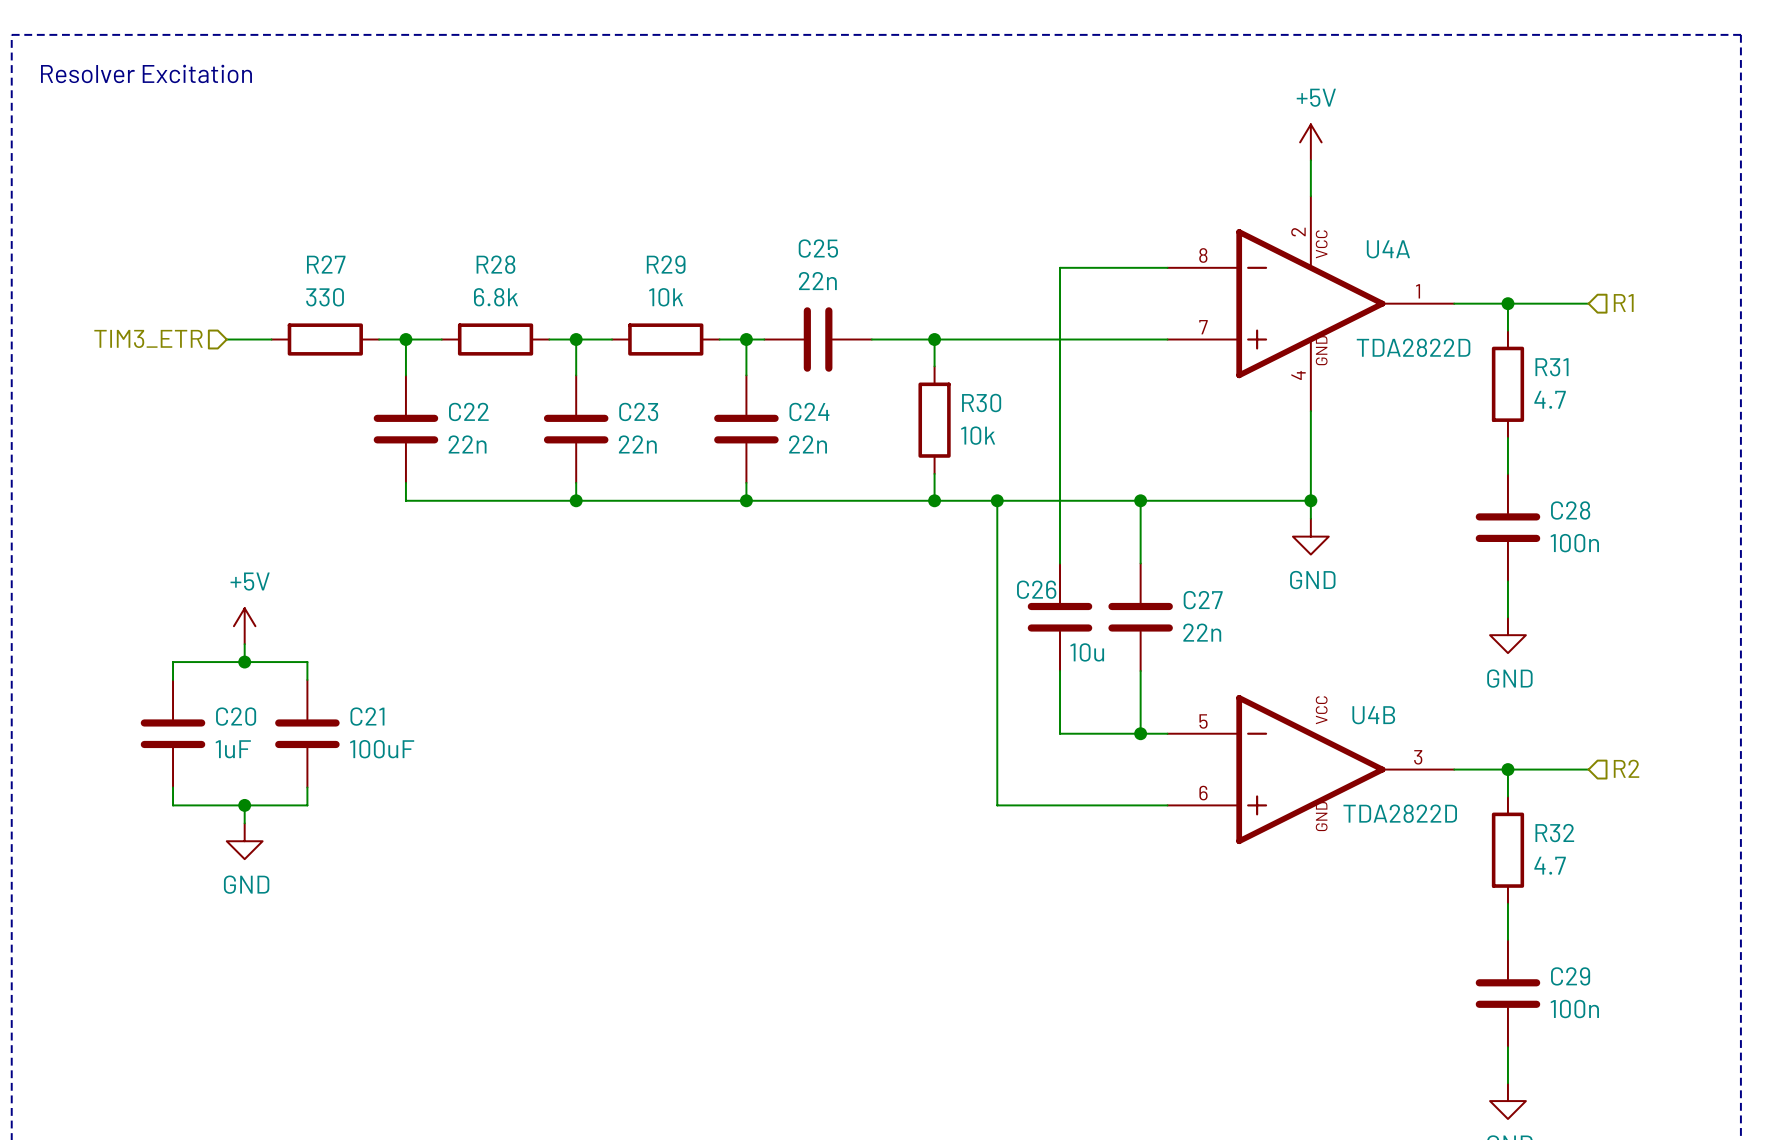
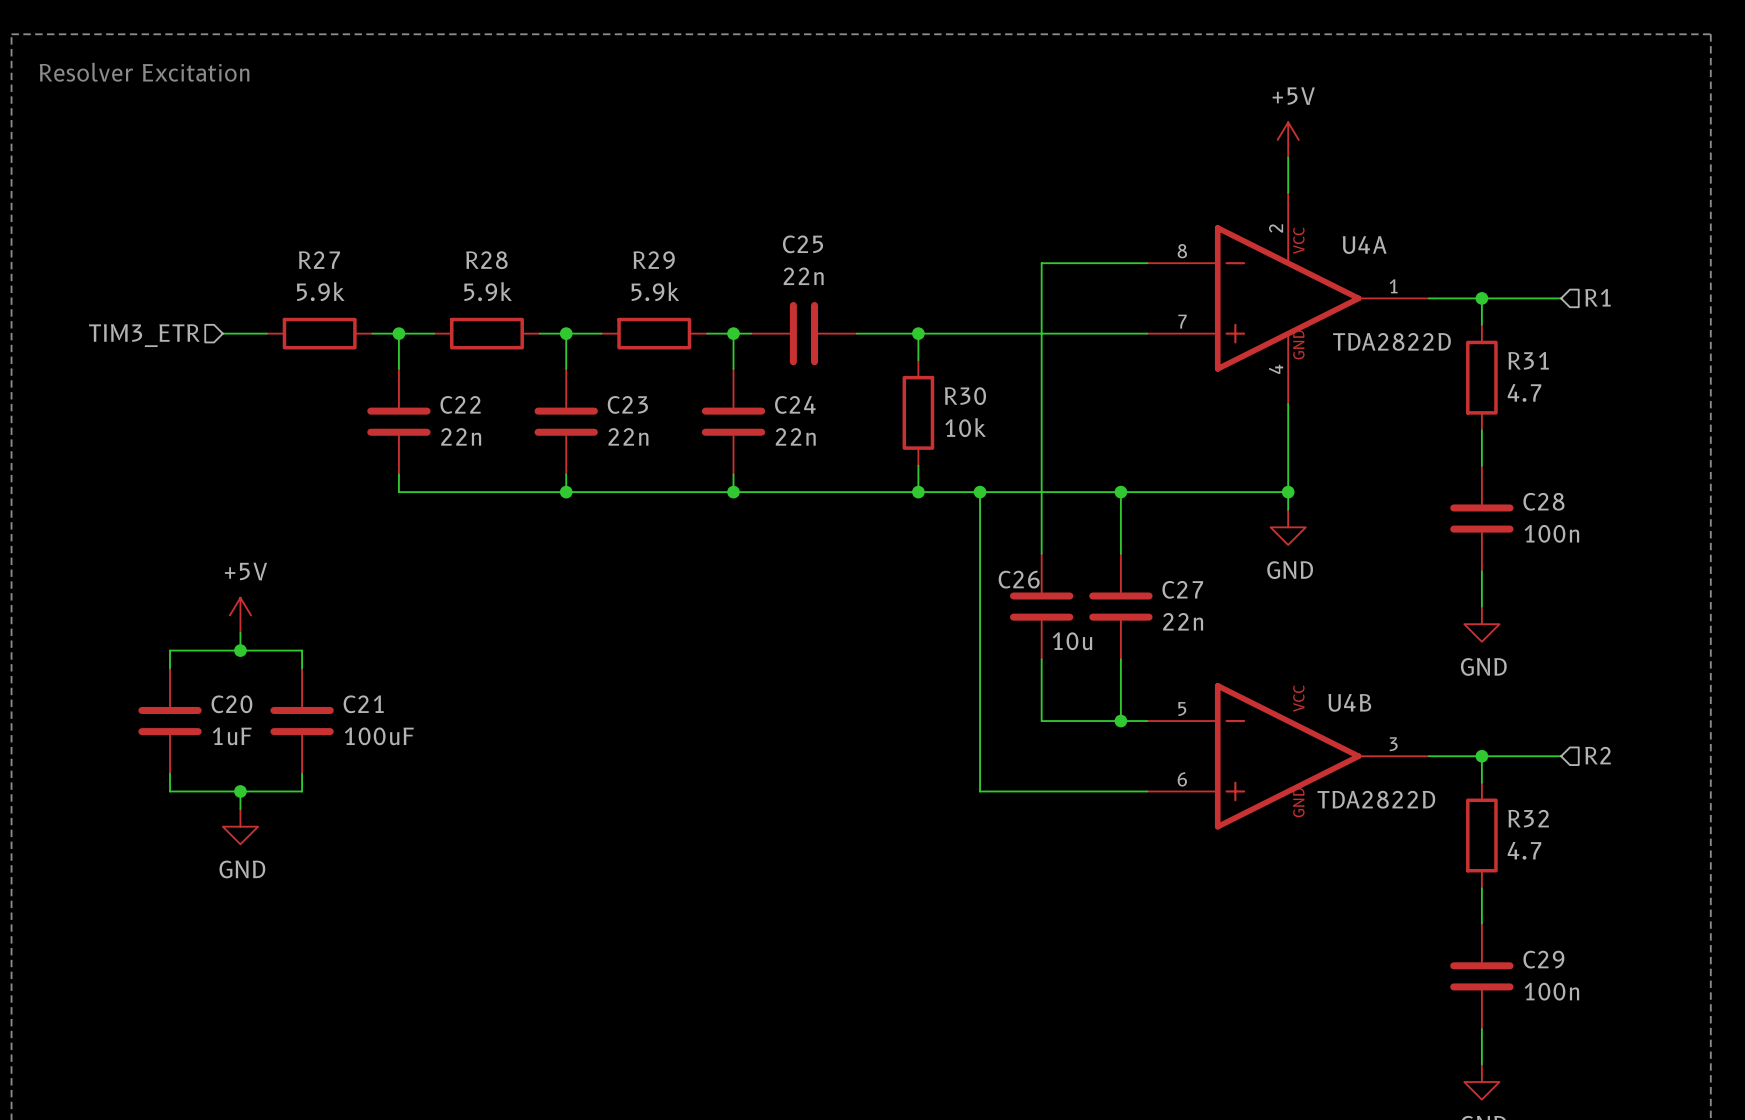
R27 value: 330 (325, 297) -> 5.9k (320, 291)
R28 value: 6.8k (496, 297) -> 5.9k (488, 291)
R29 value: 10k (666, 297) -> 5.9k (655, 291)

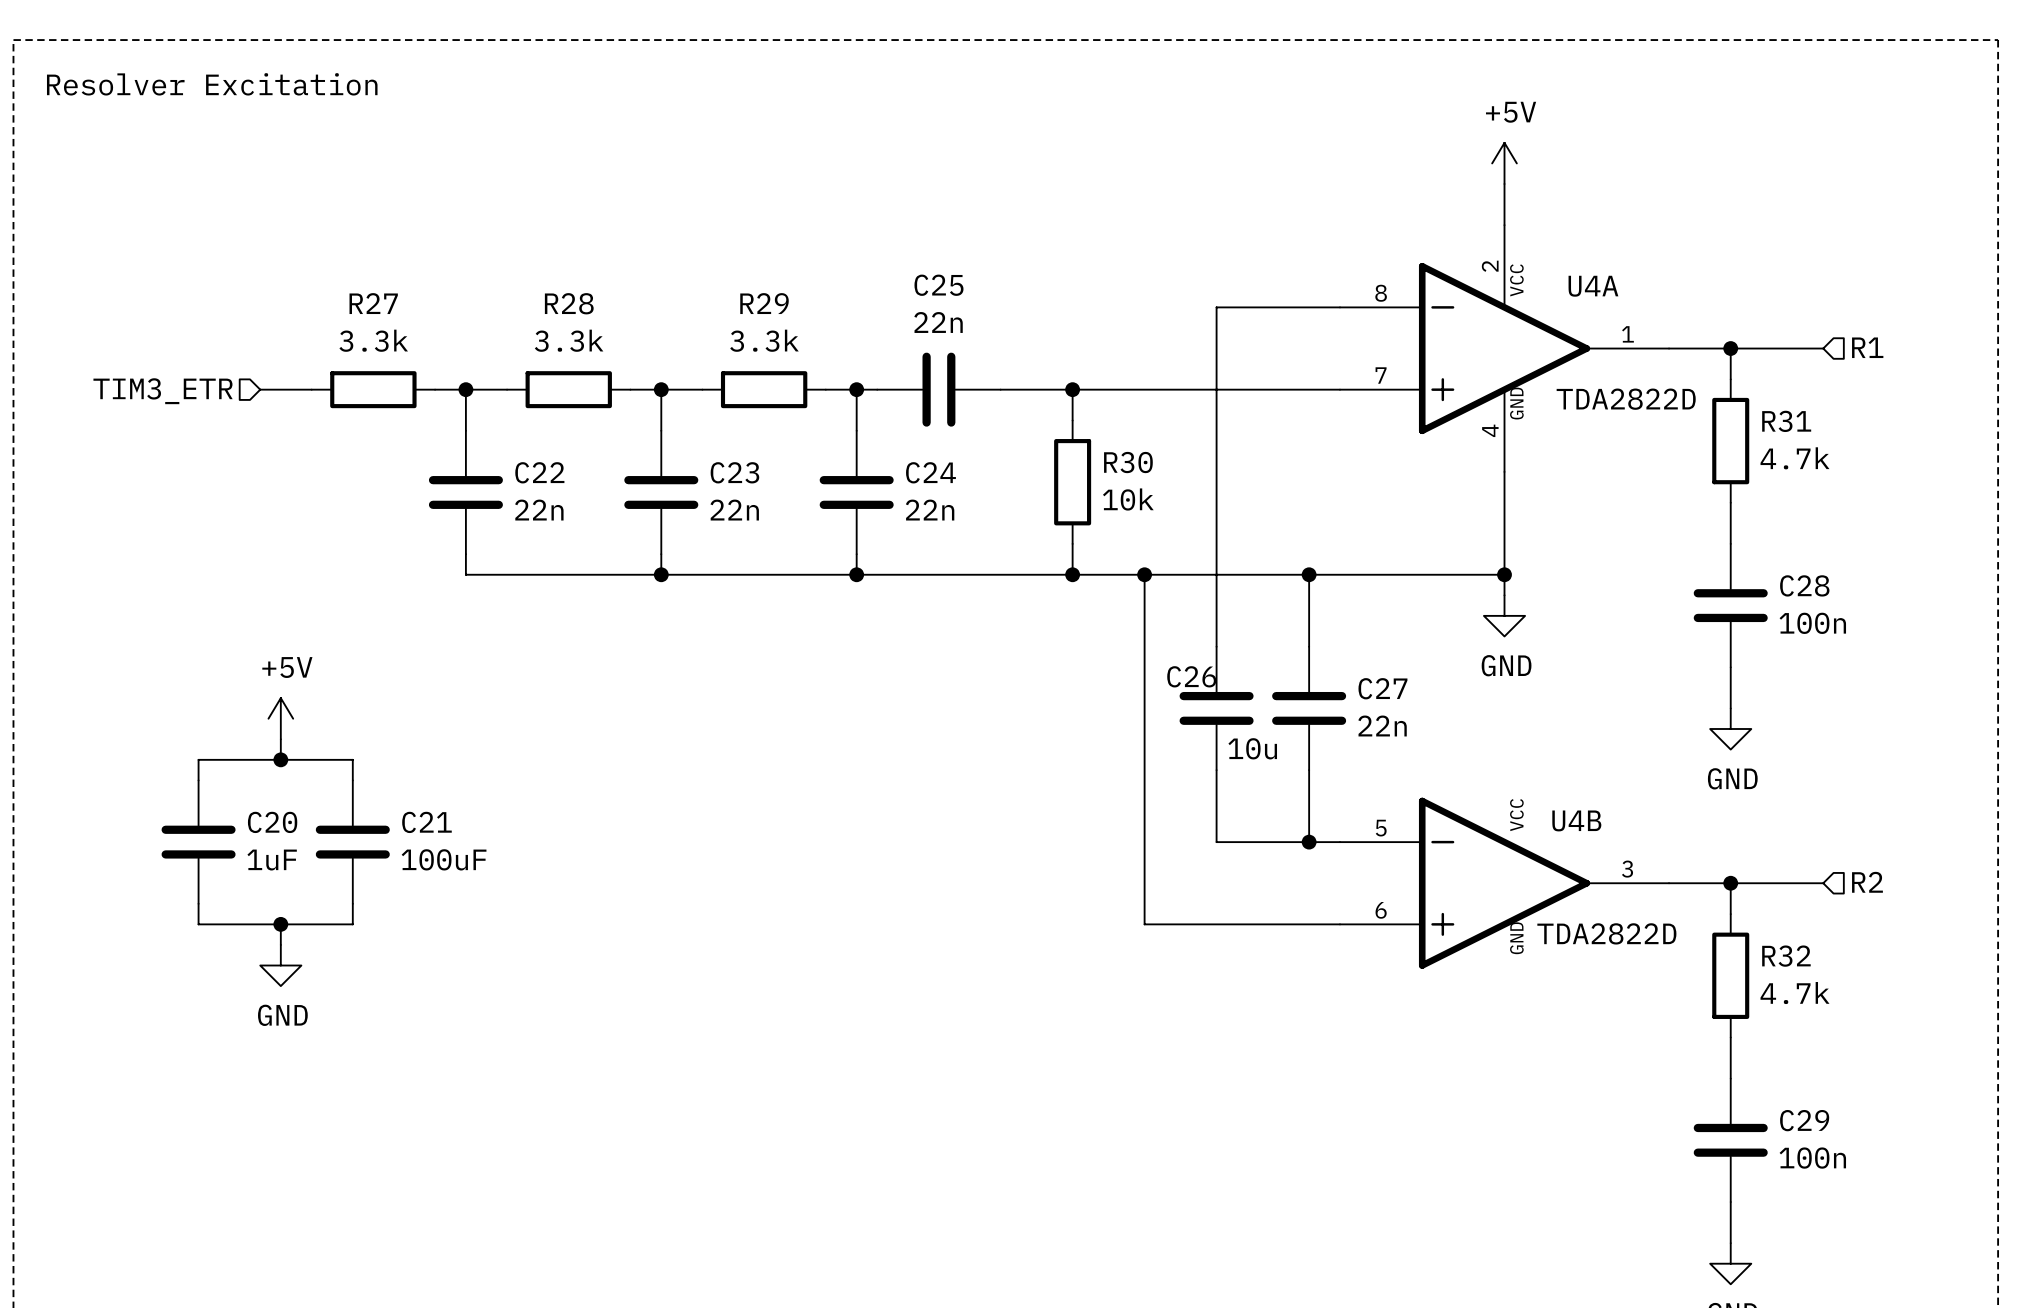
R27 value: 5.9k (320, 291) -> 3.3k (373, 340)
R28 value: 5.9k (488, 291) -> 3.3k (569, 340)
R29 value: 5.9k (655, 291) -> 3.3k (764, 340)
R31 value: 4.7 (1524, 392) -> 4.7k (1795, 458)
R32 value: 4.7 (1524, 850) -> 4.7k (1795, 993)

